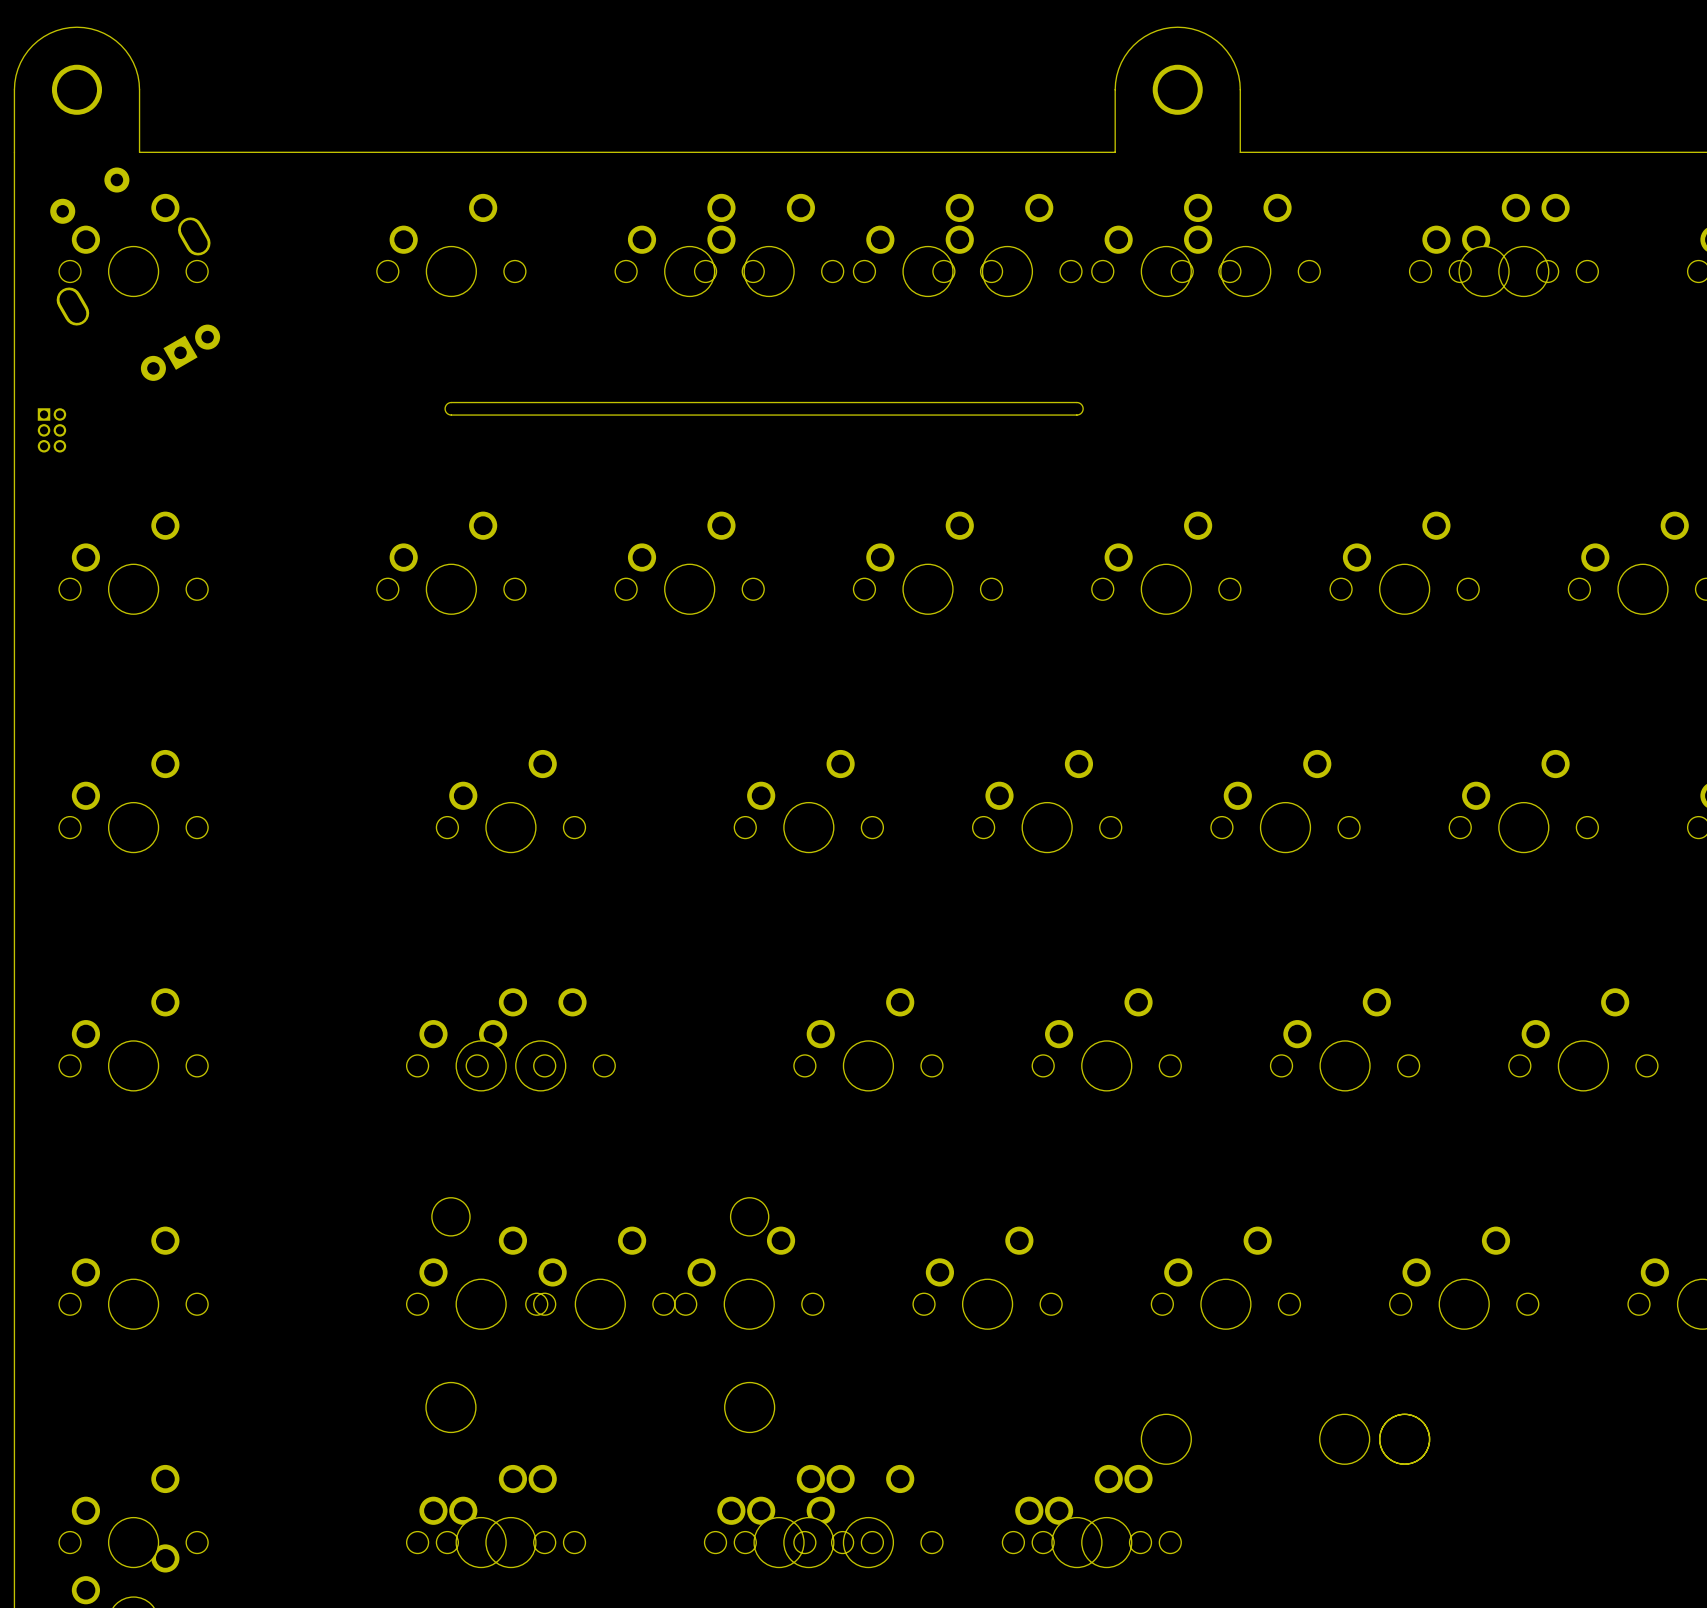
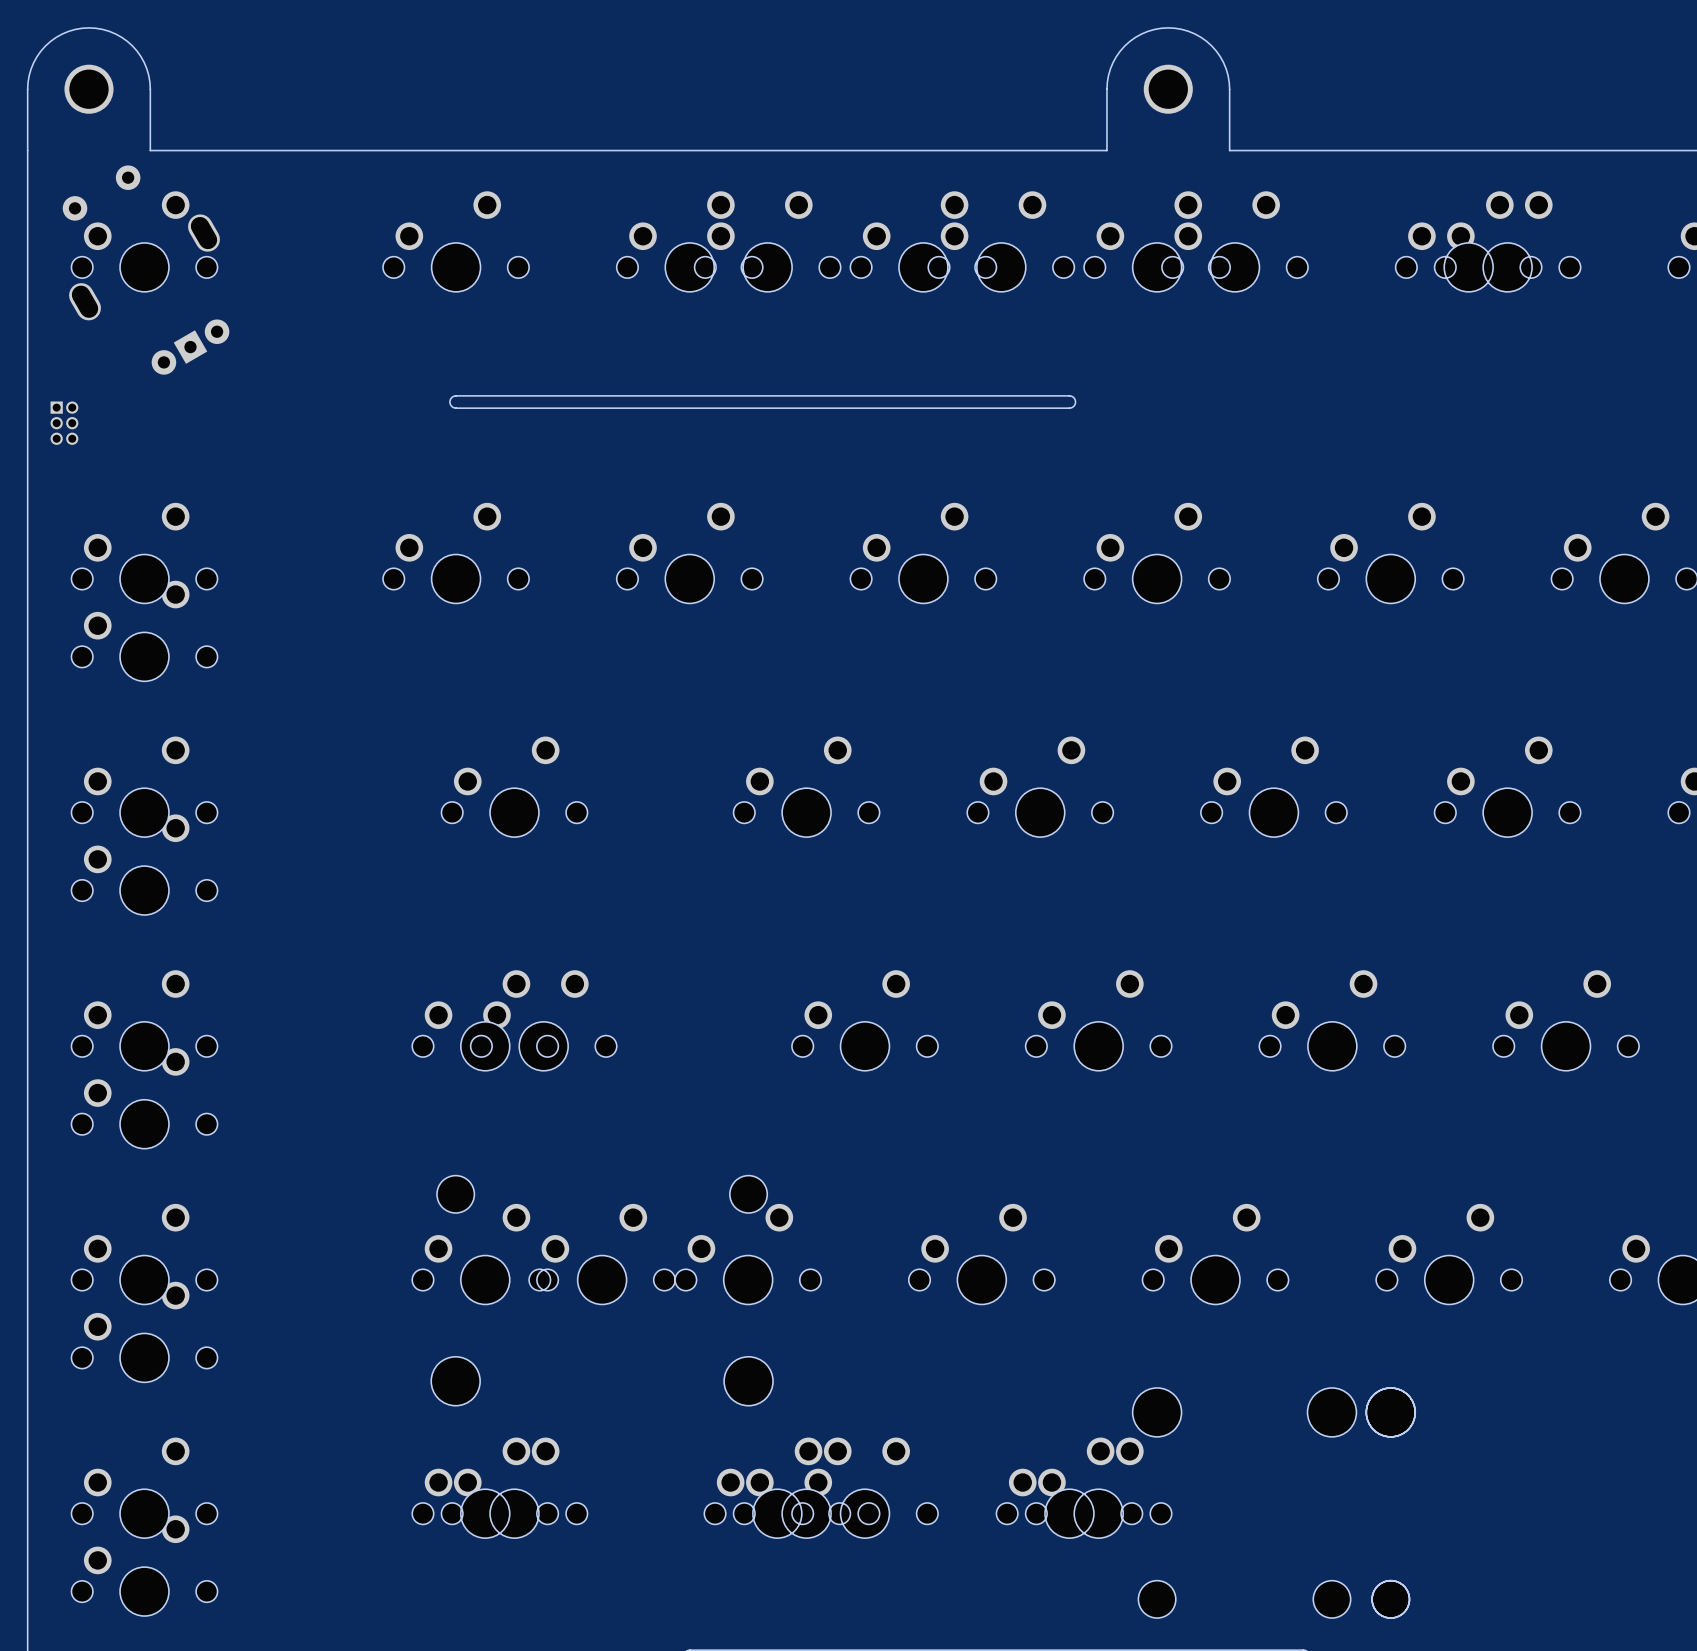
part: none -> (144, 631)
part: none -> (144, 864)
part: none -> (144, 1098)
part: none -> (144, 1332)

